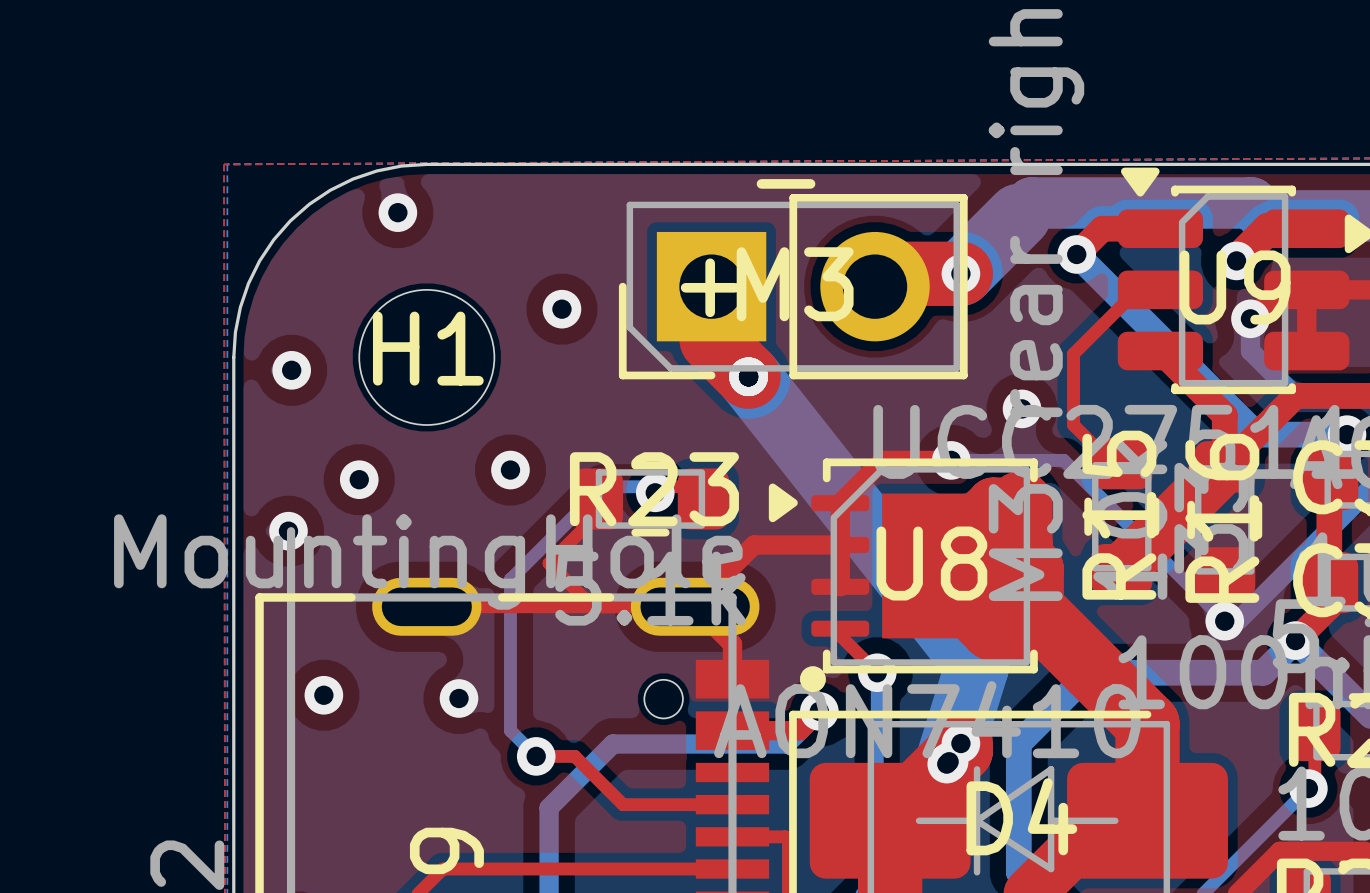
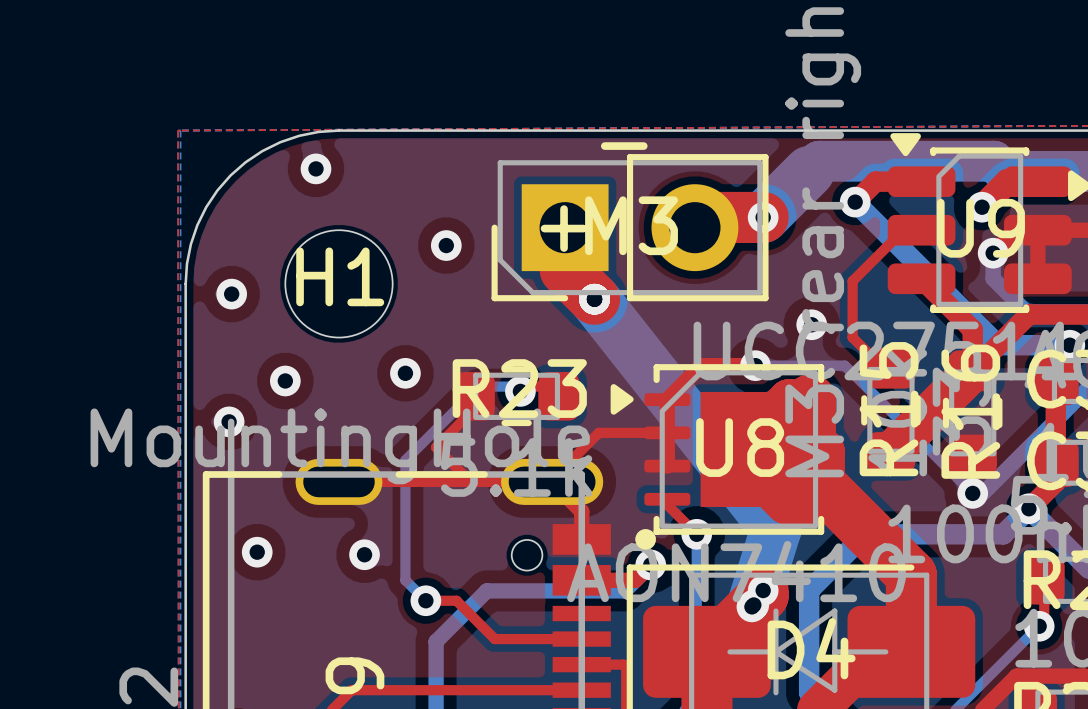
top track width: thick (840, 545) (754, 545) (695, 603) -> thin (667, 432) (598, 432) (552, 479)

